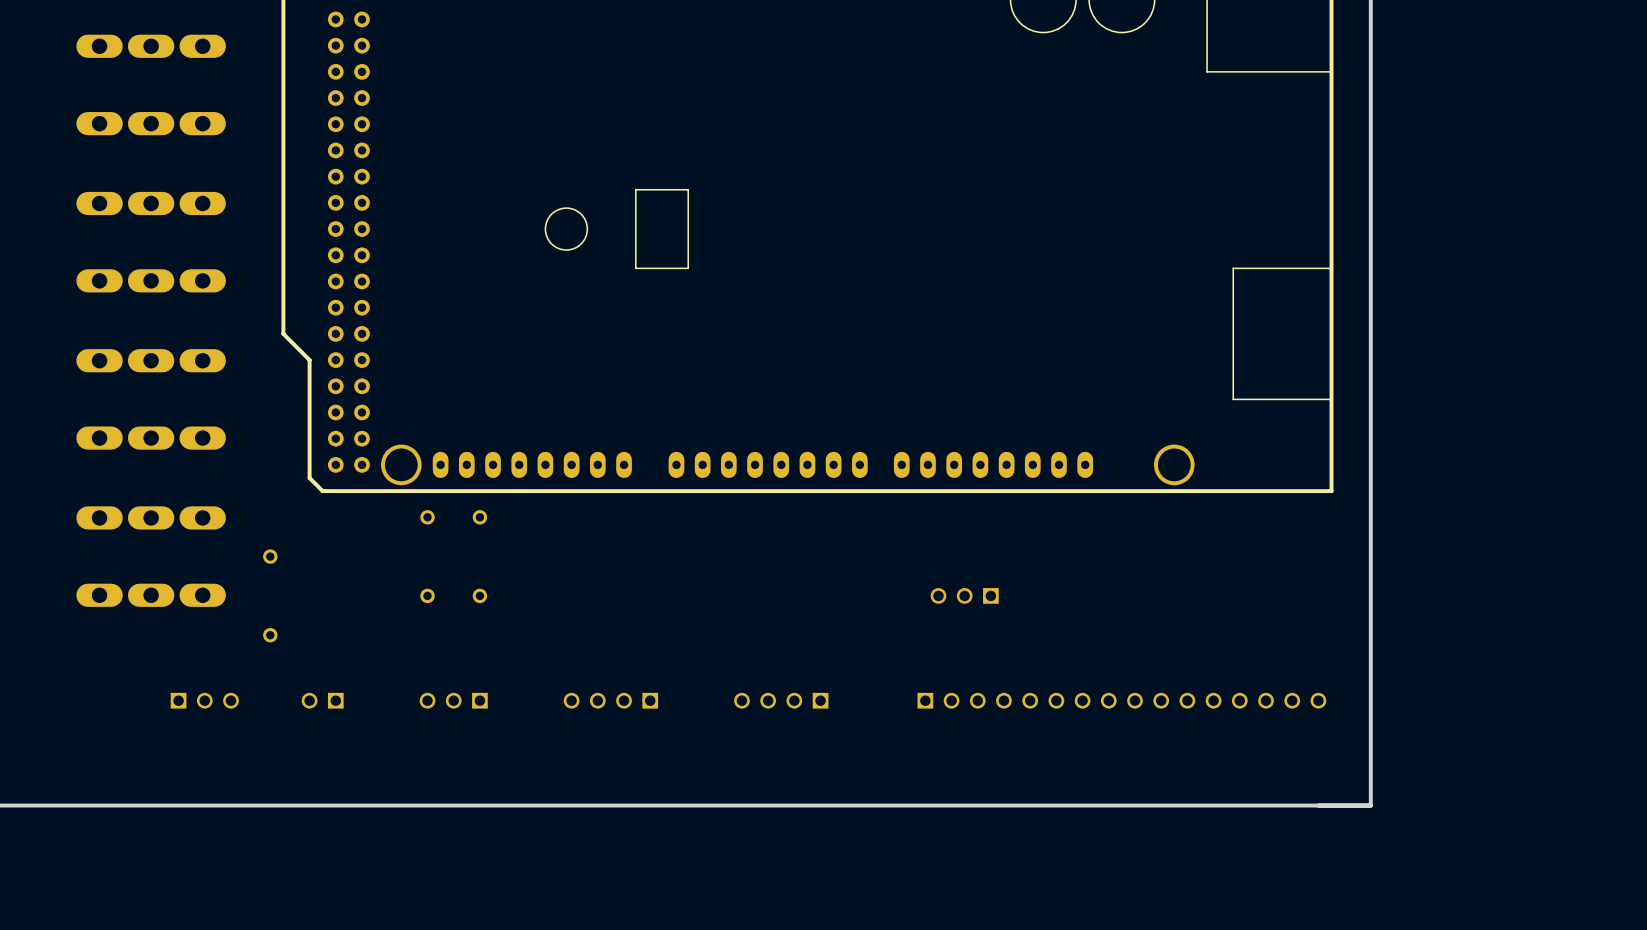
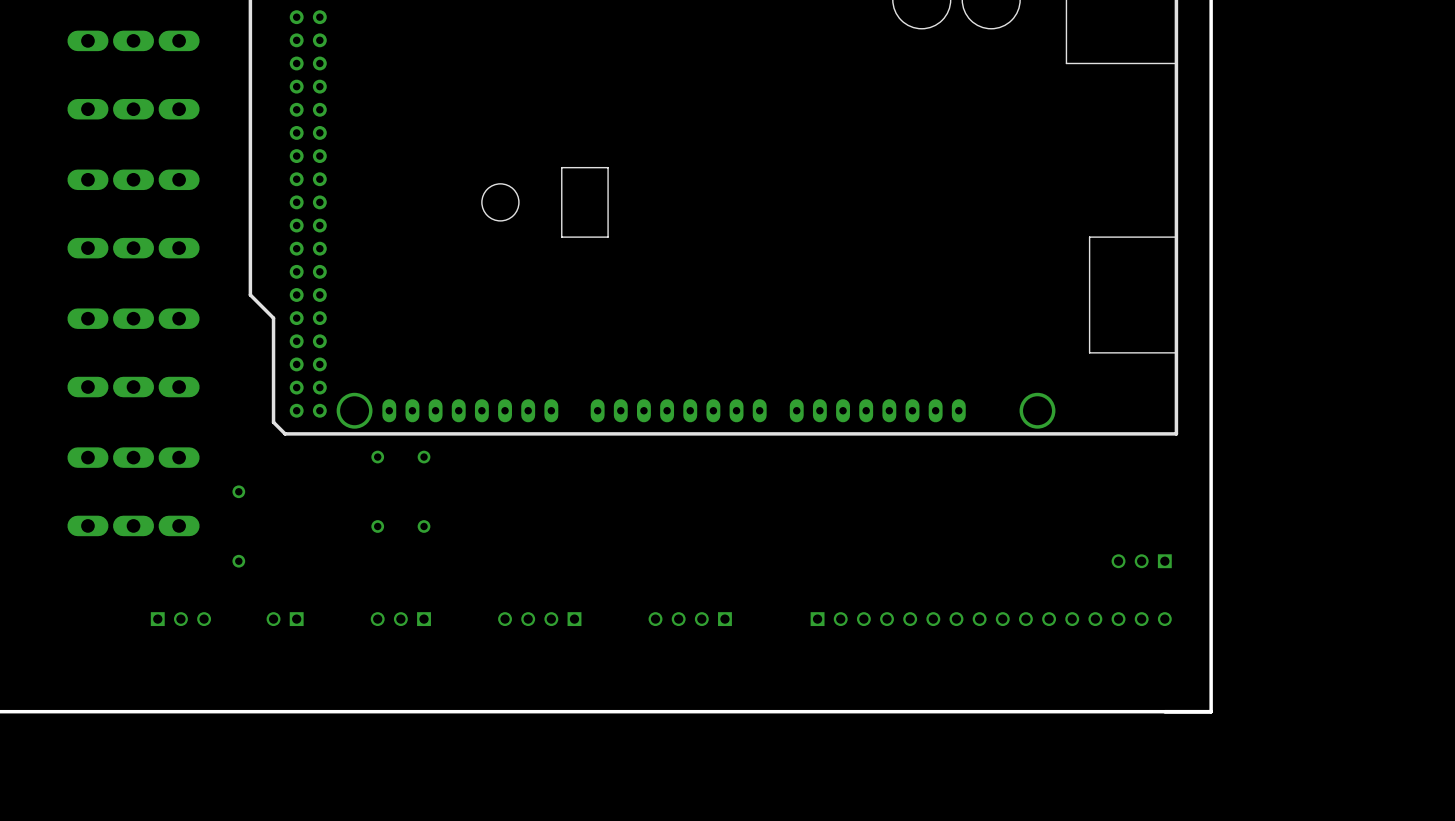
part: (964, 595) -> none
part: none -> (1141, 561)

